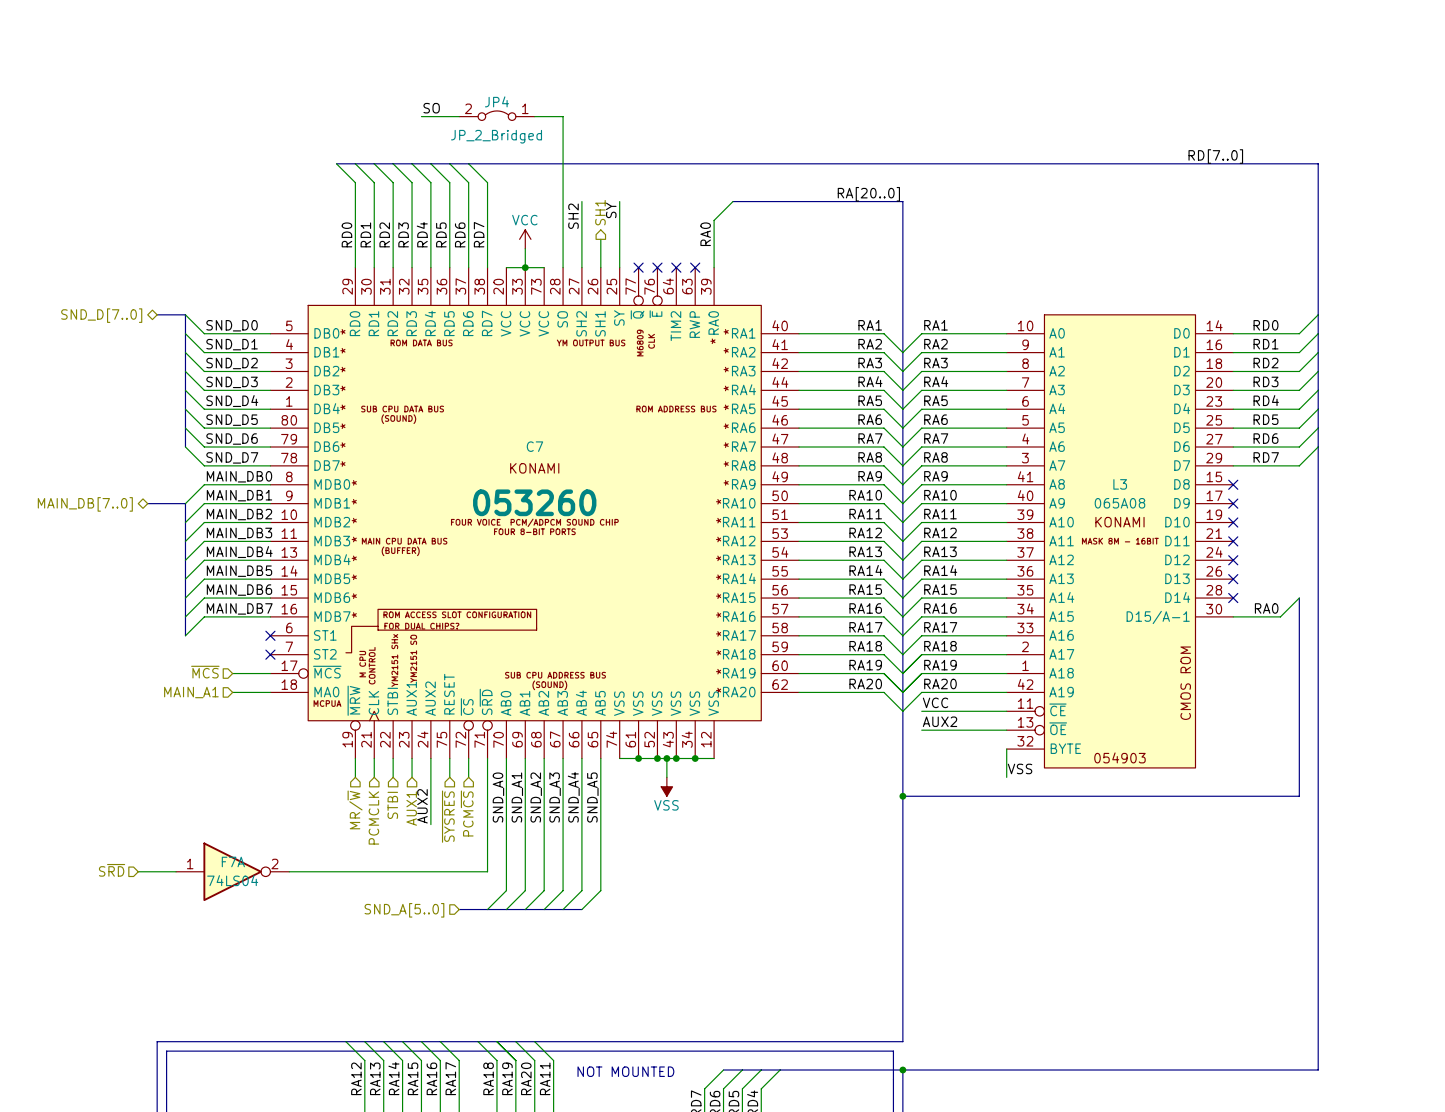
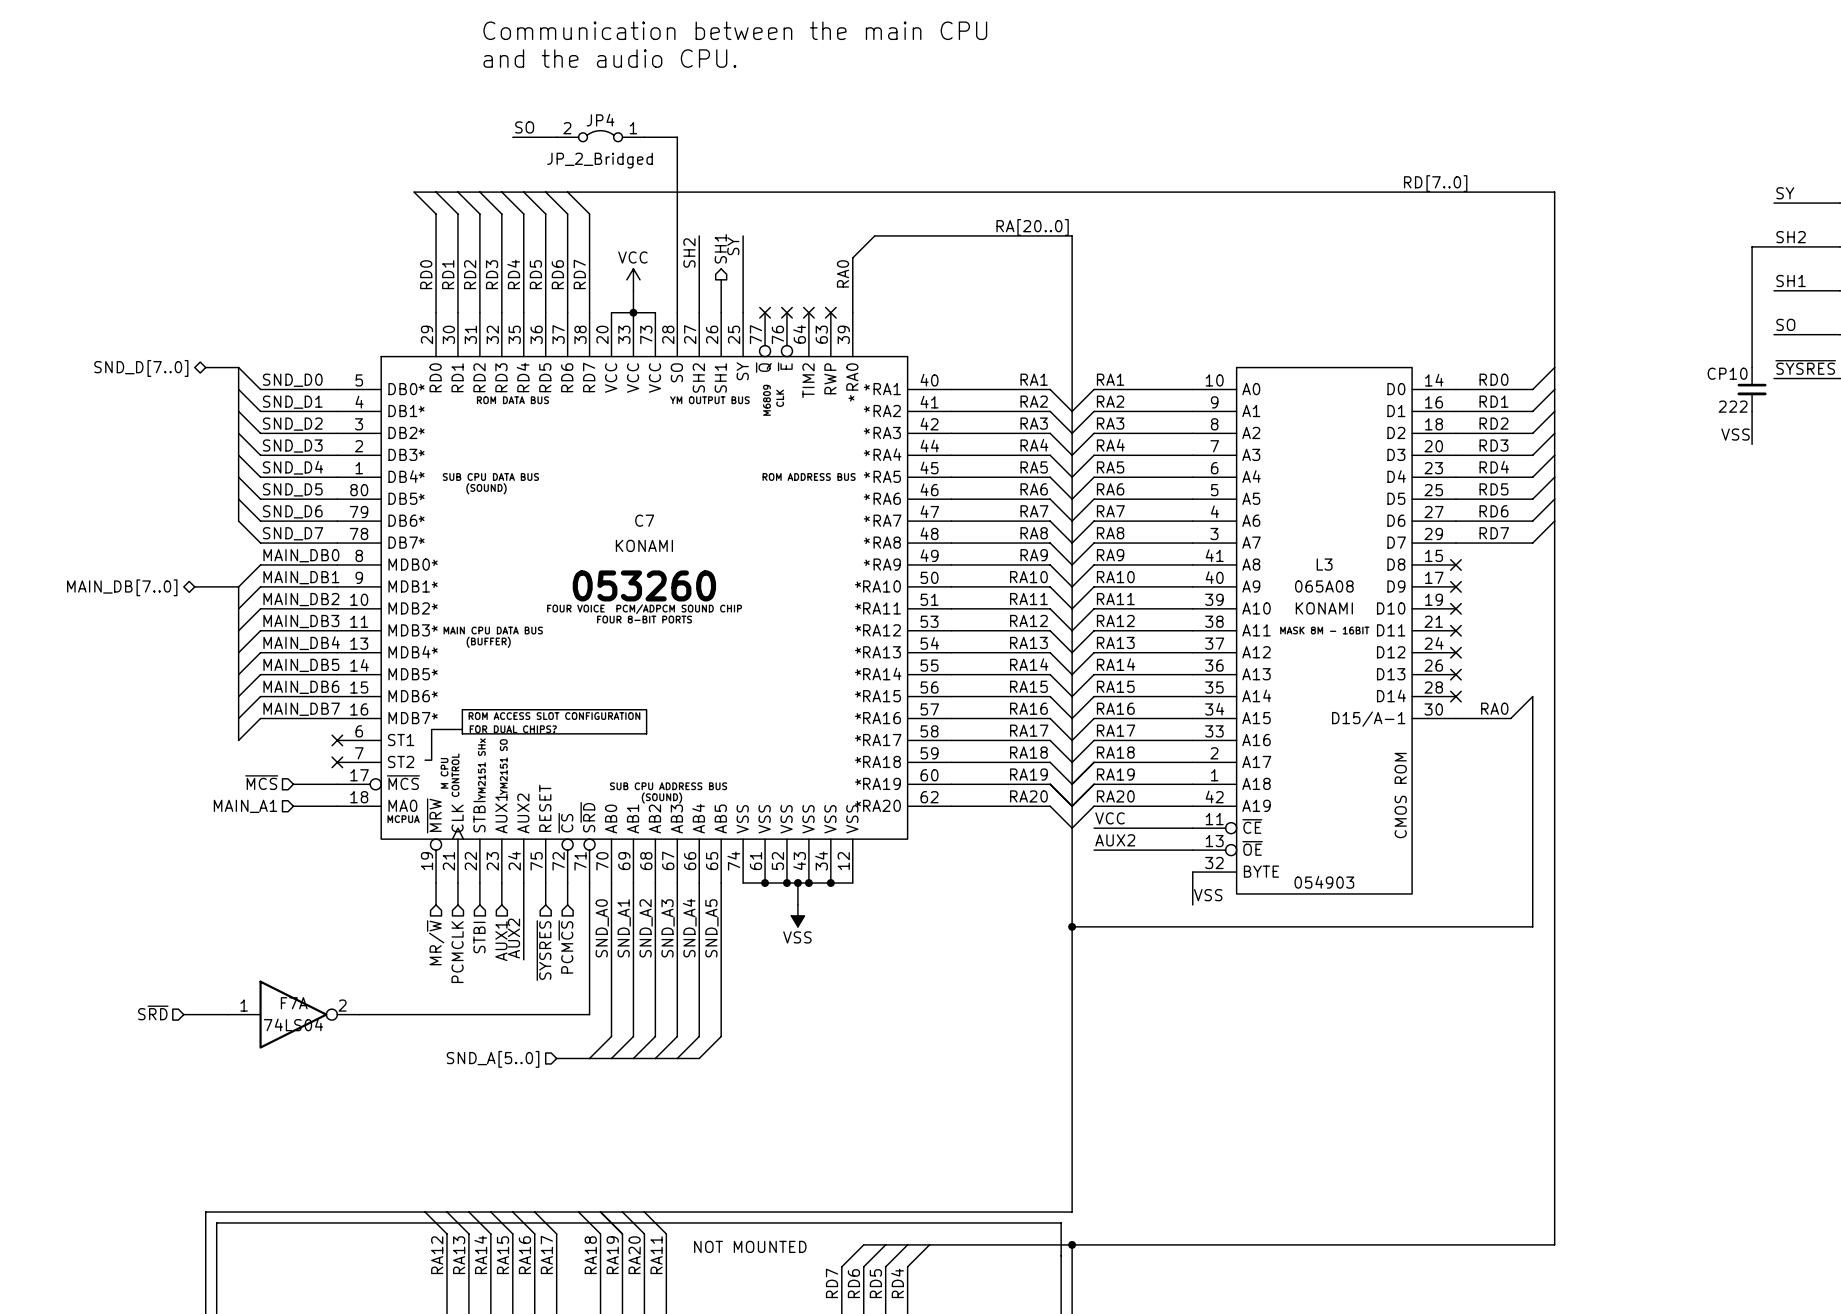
text: none -> Communication between the main CPU (735, 30)
text: none -> and the audio CPU. (609, 58)

